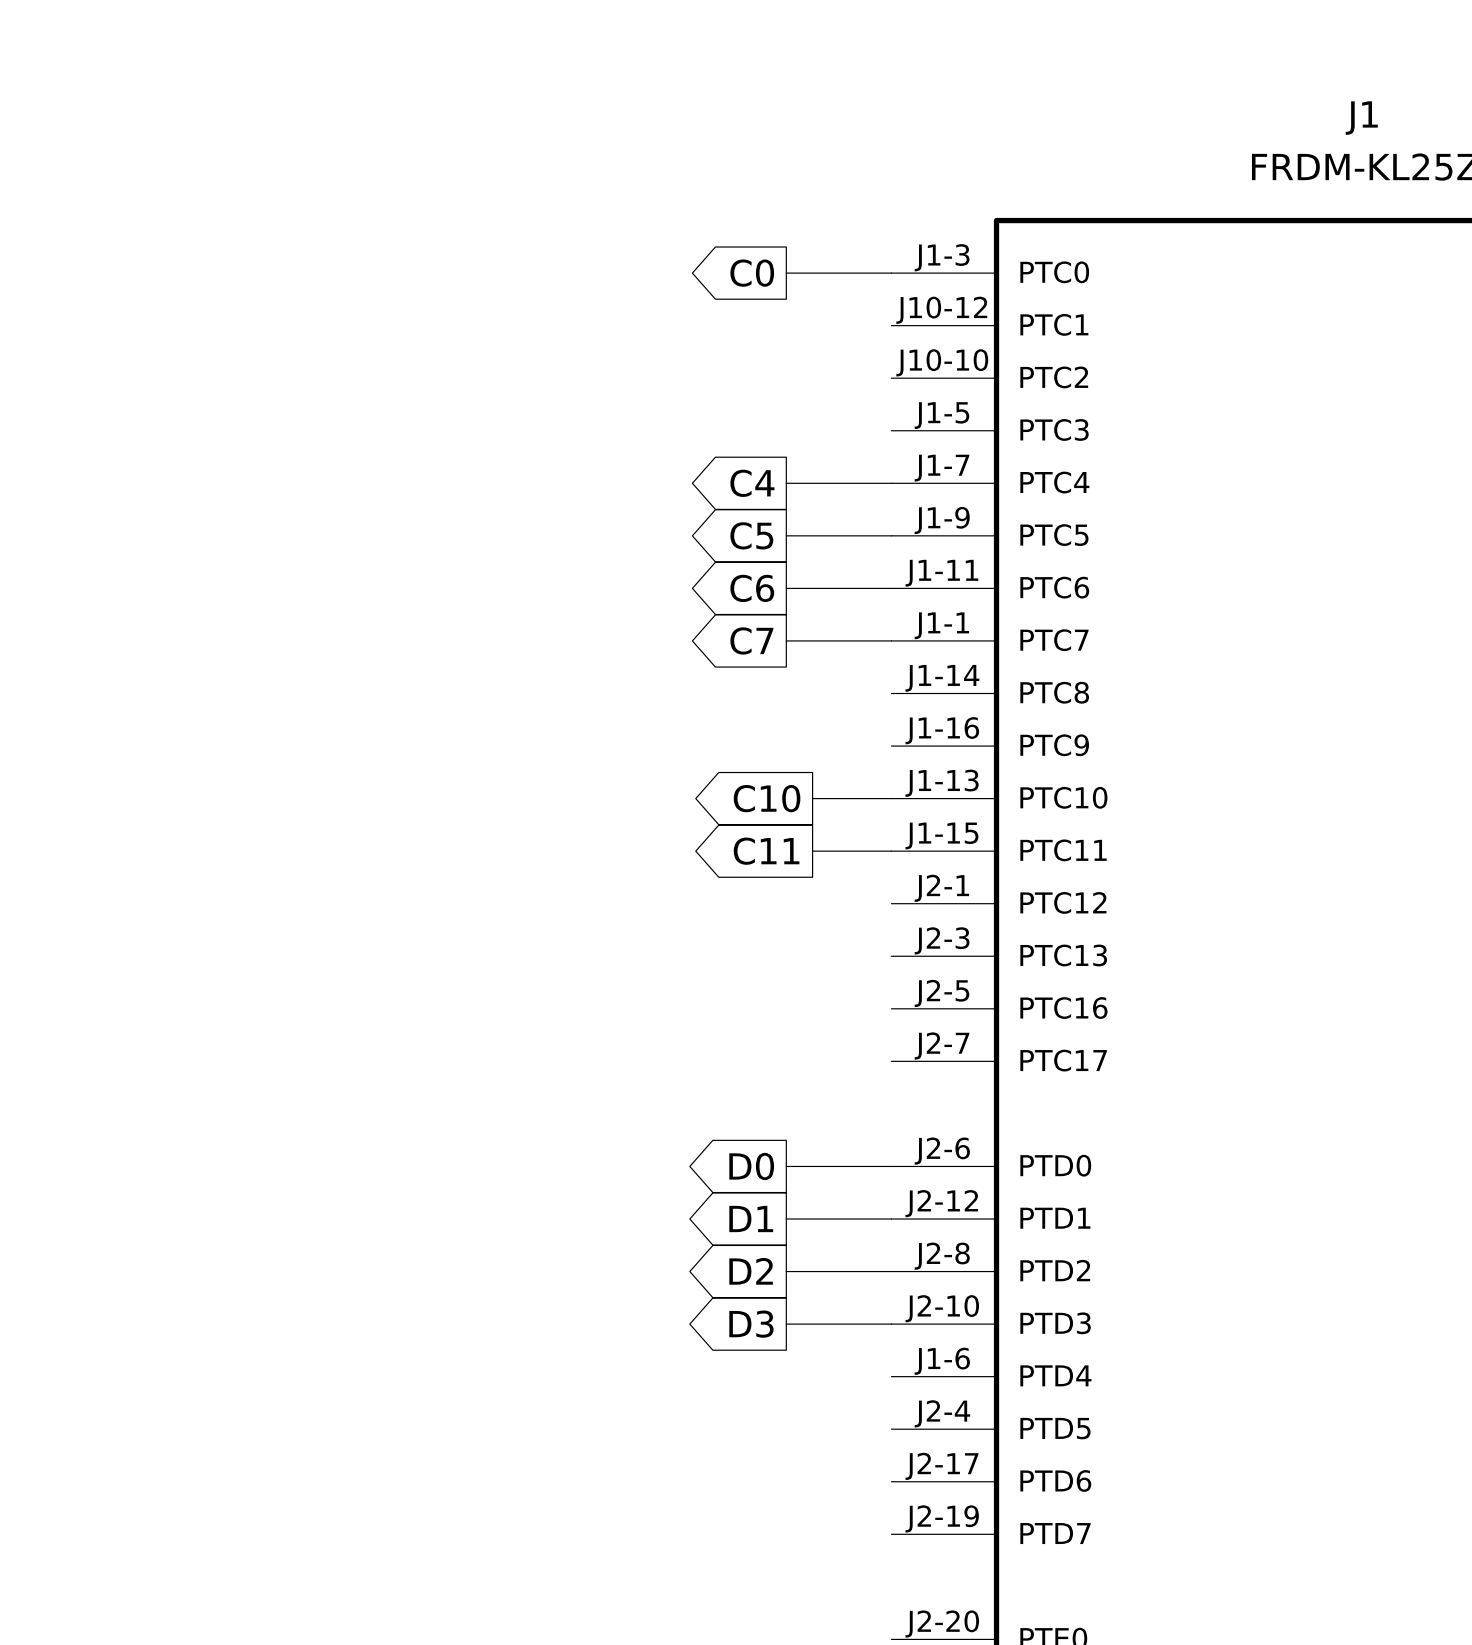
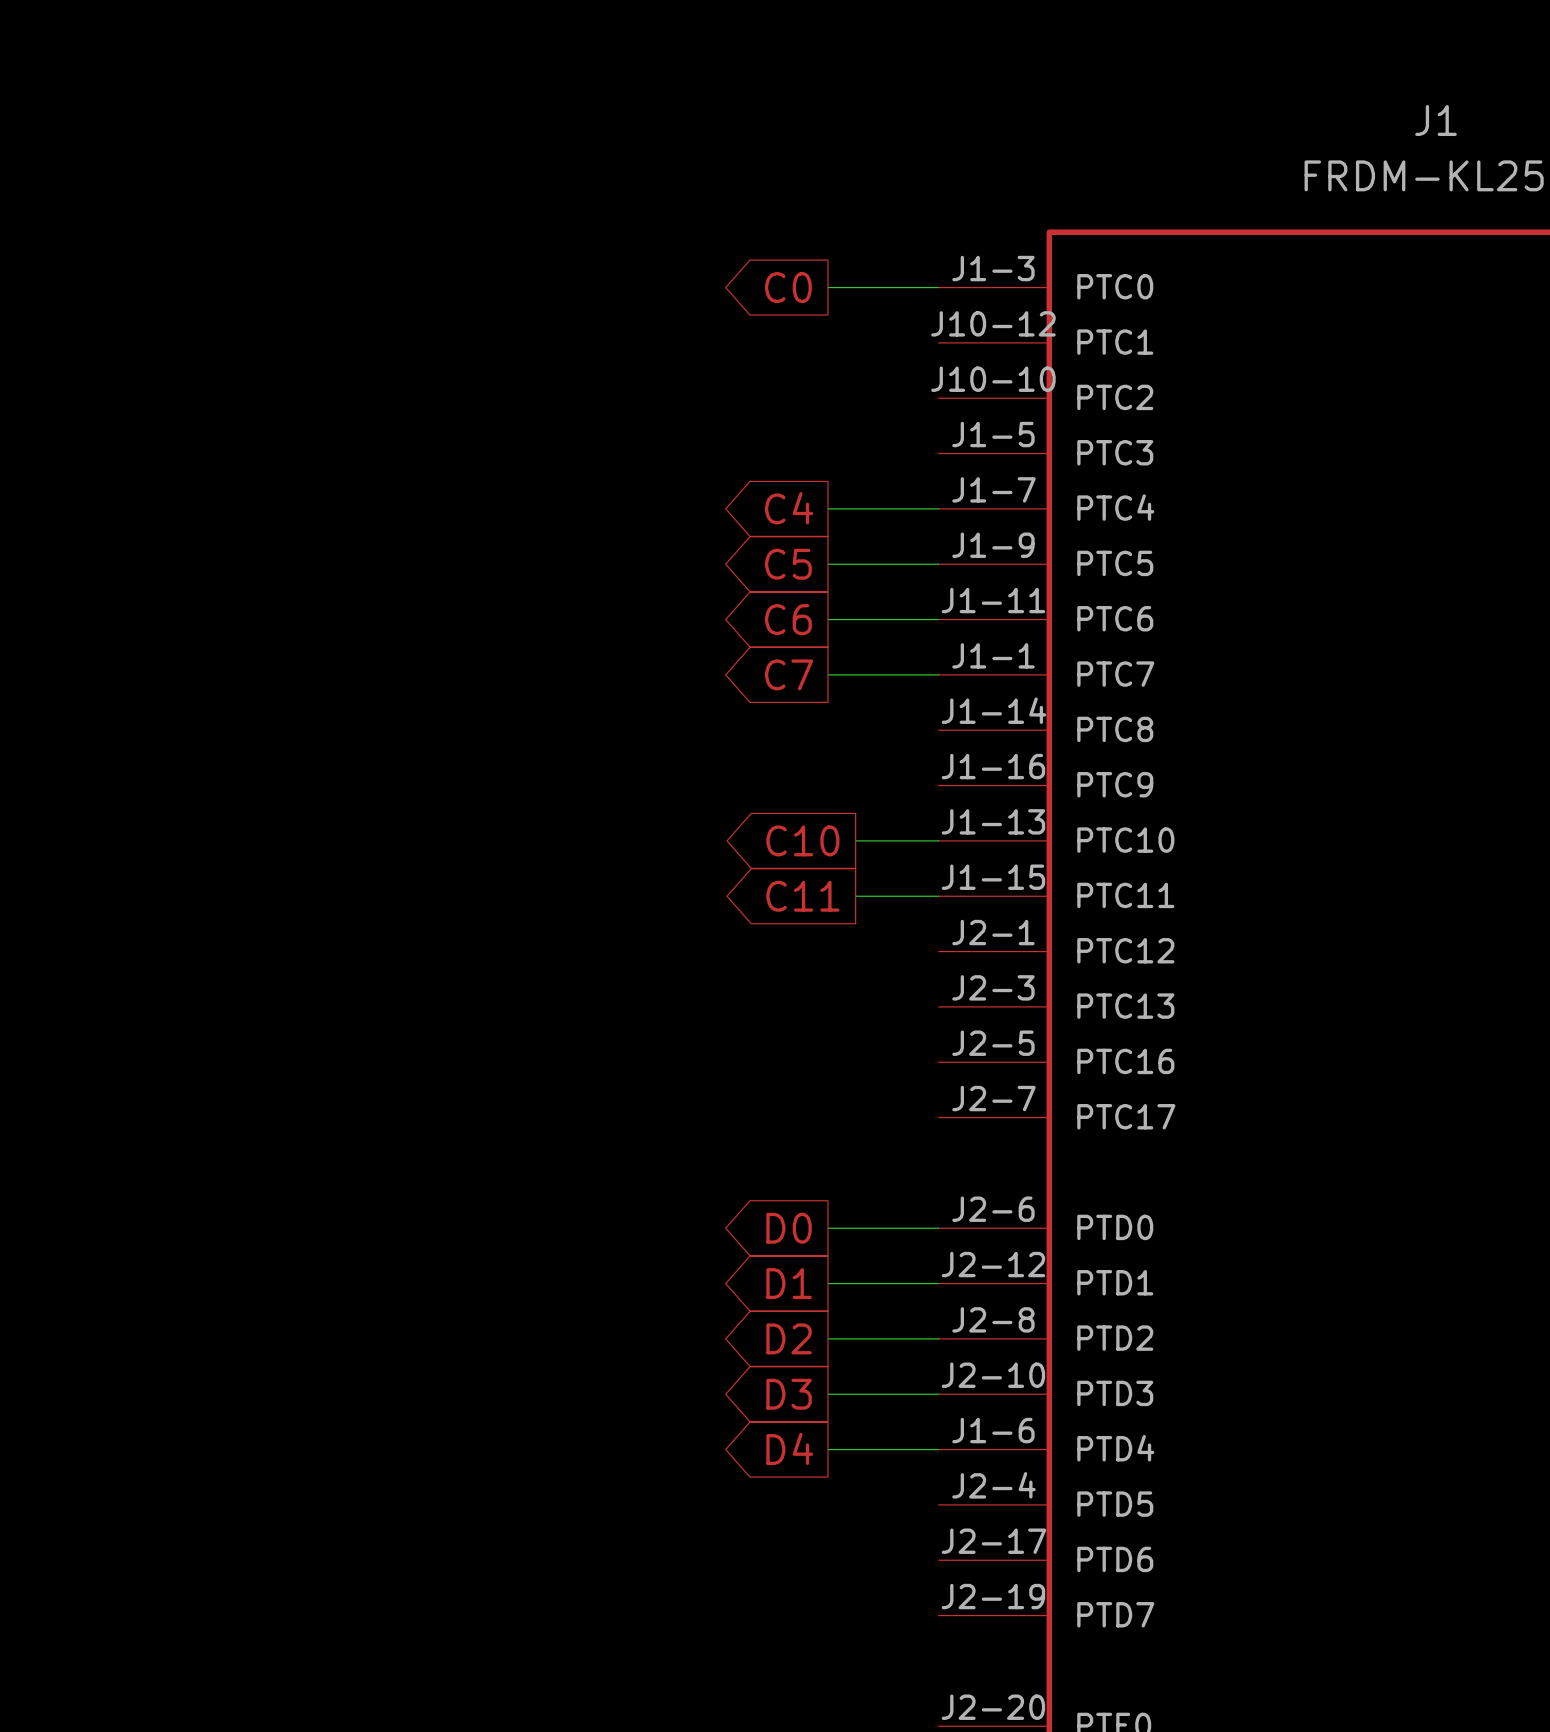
global label: none -> D4 (789, 1448)
wire: none -> (827, 1449) (938, 1449)

